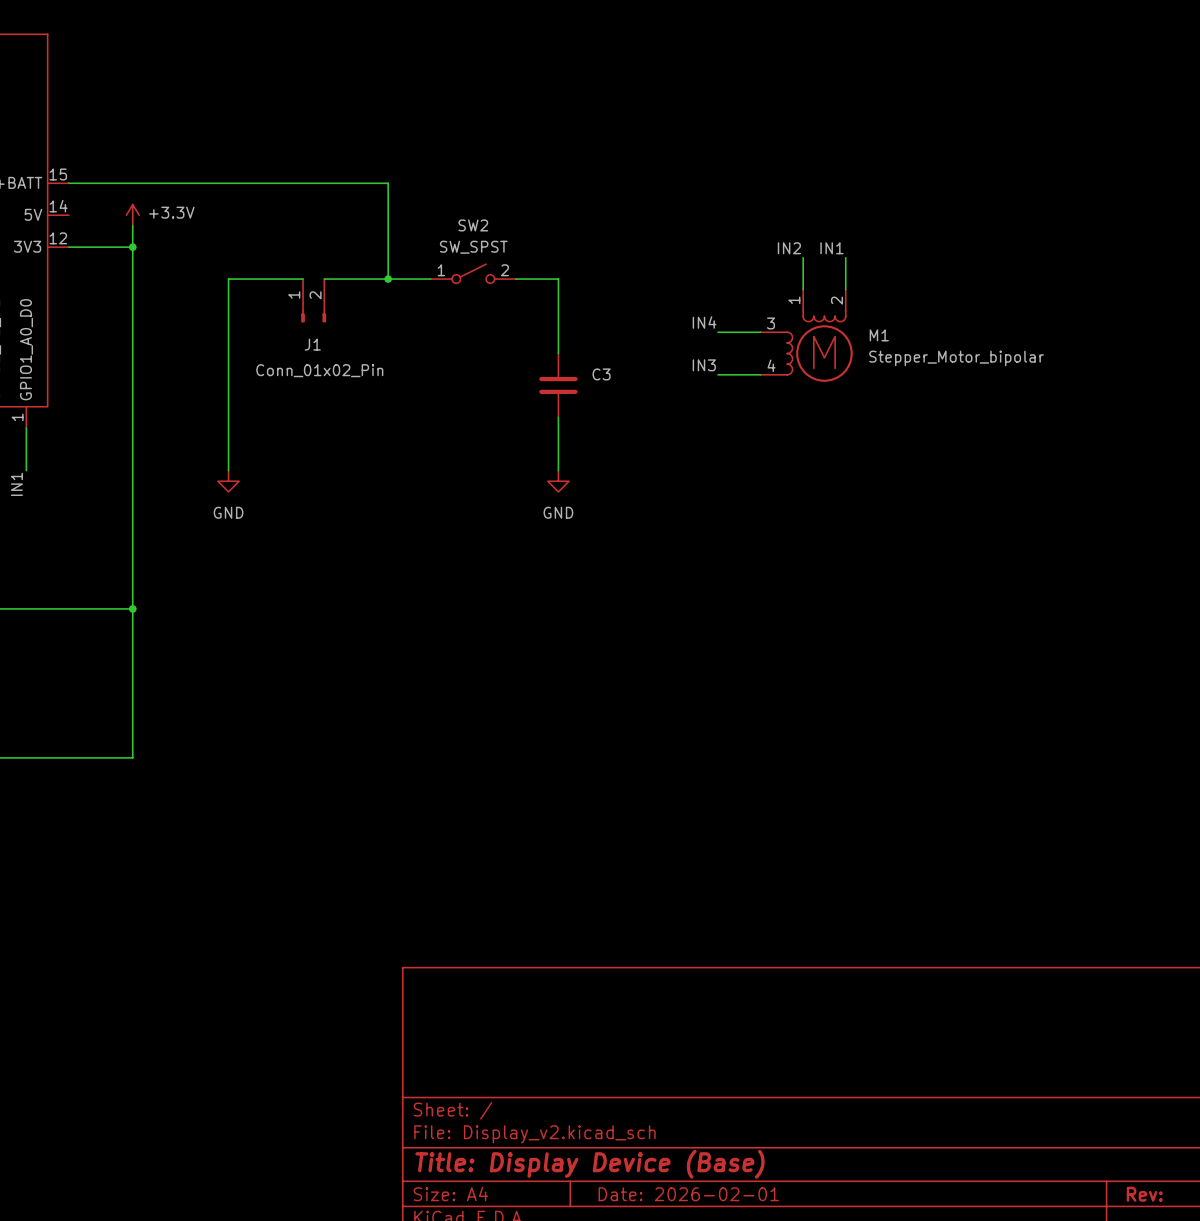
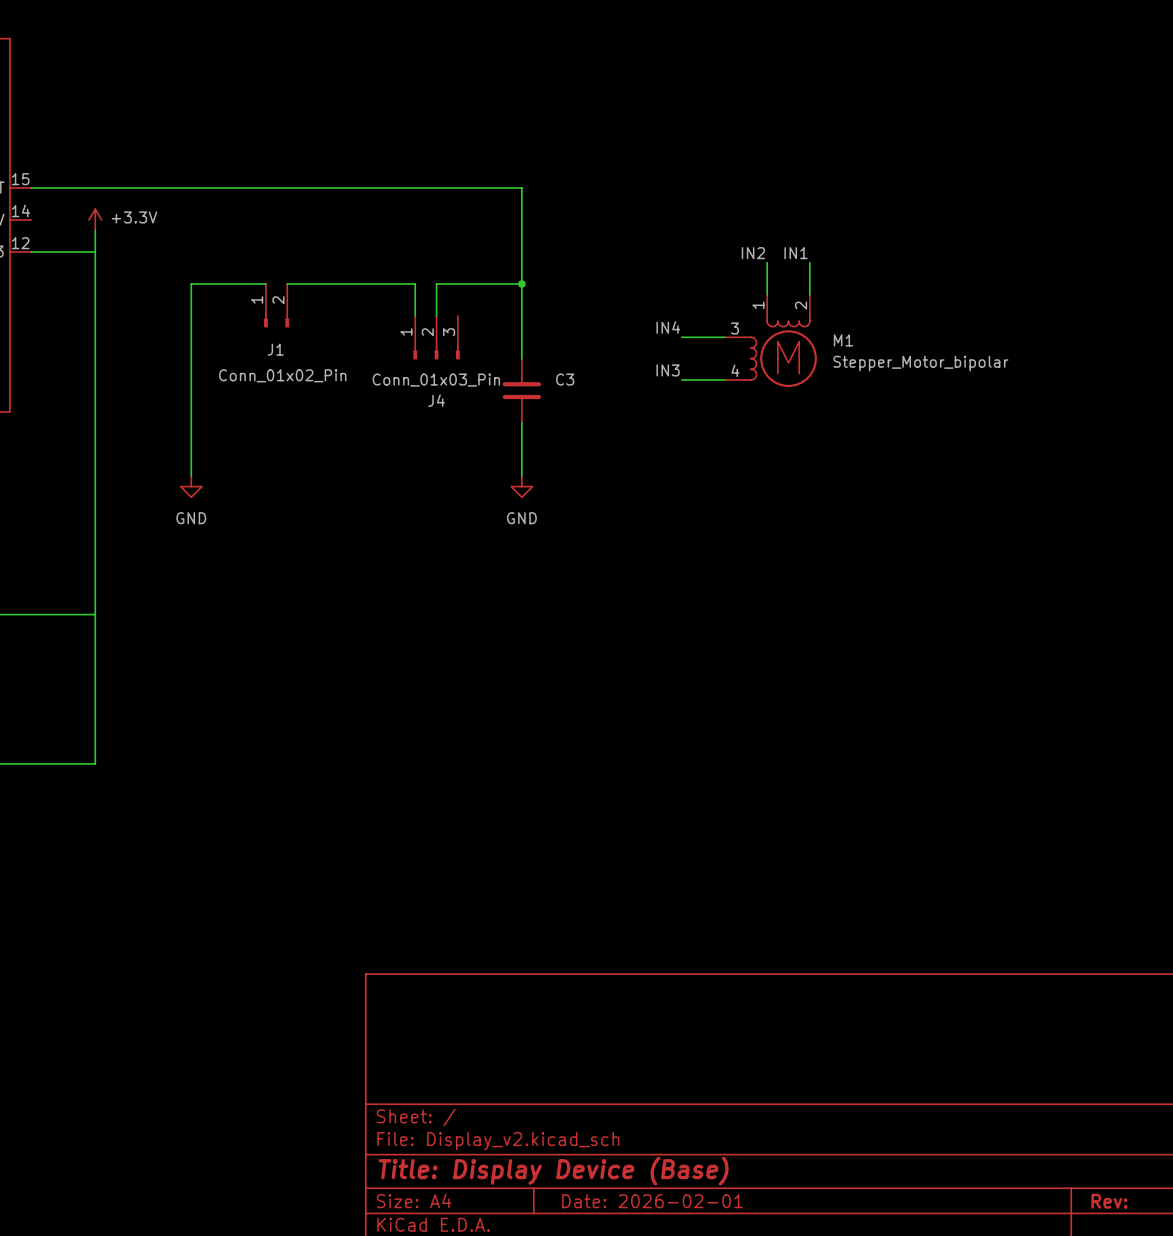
wire: (388, 183) (388, 279) -> (351, 187) (521, 187) (521, 283)
junction: (132, 247) -> none
SW2: SW_SPST (473, 273) -> none
junction: (388, 279) -> none
wire: none -> (393, 283) (415, 283) (415, 315)
wire: none -> (479, 283) (436, 283) (436, 315)
junction: none -> (521, 283)
J4: none -> Conn_01x03_Pin (436, 337)
junction: (132, 608) -> none

